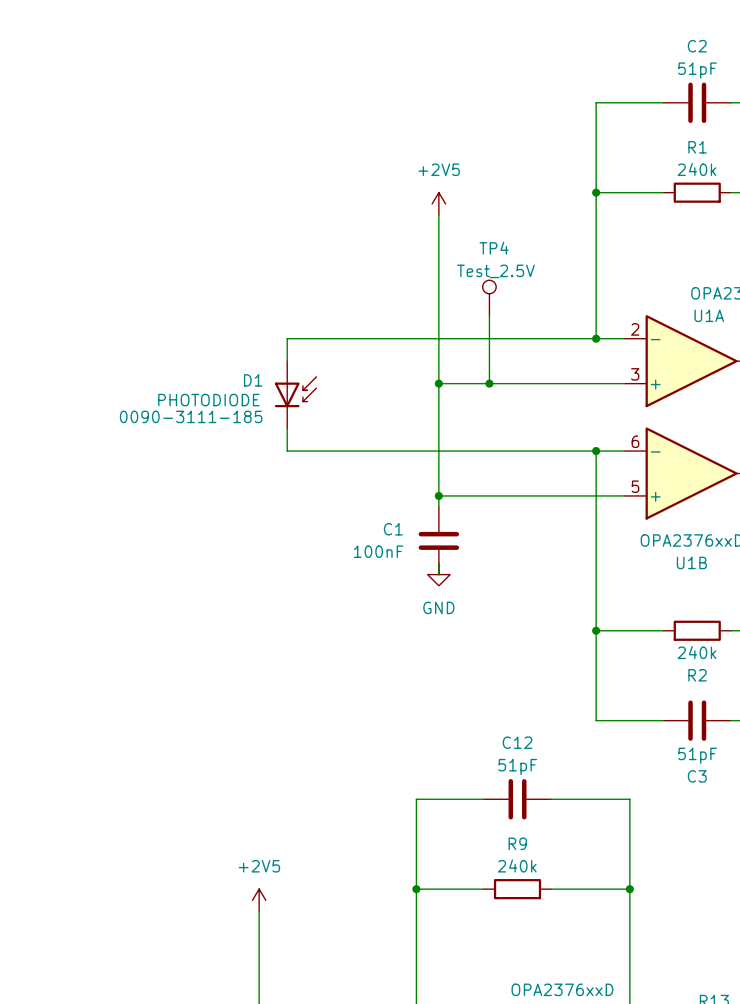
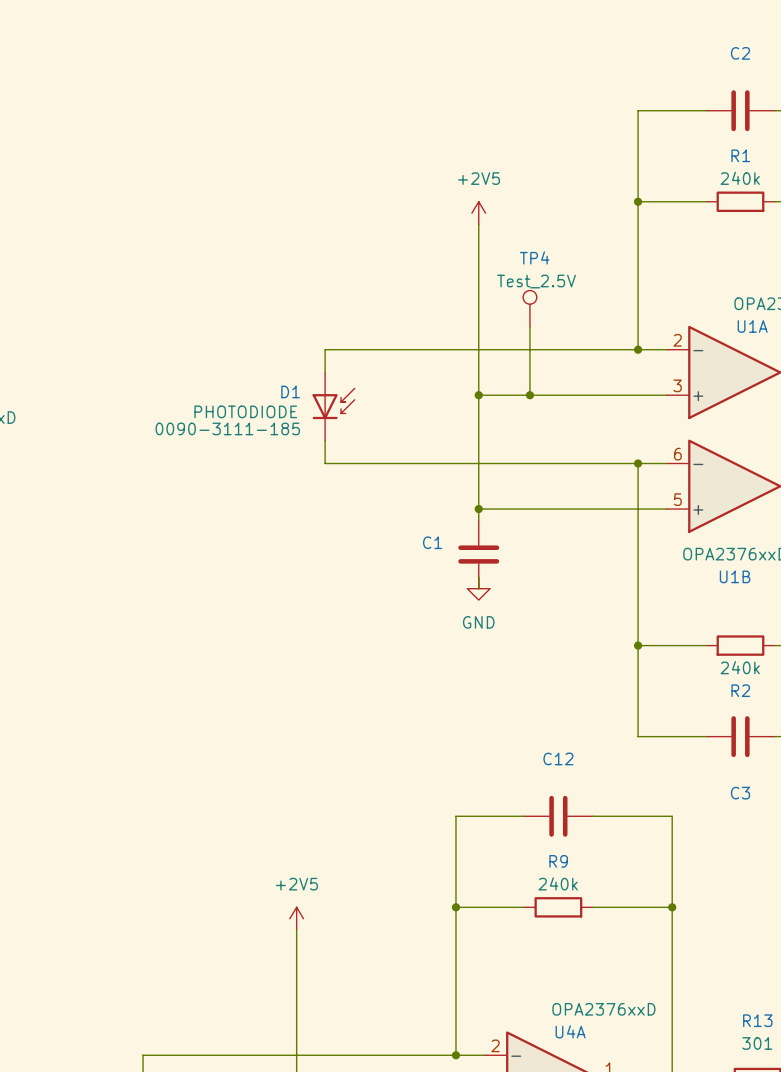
C2 value: 51pF (697, 70) -> none
C1 value: 100nF (378, 551) -> none
C3 value: 51pF (697, 755) -> none
C12 value: 51pF (517, 767) -> none

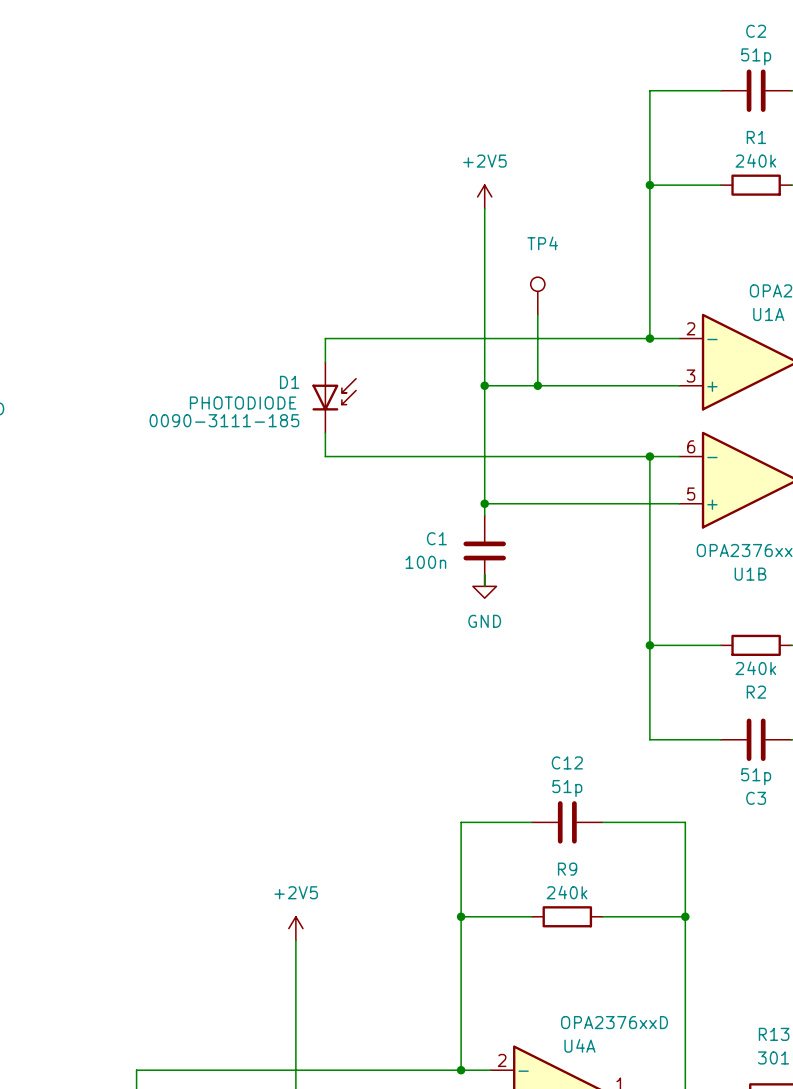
C2 value: none -> 51p (756, 56)
TP4 value: Test_2.5V (536, 281) -> none
C1 value: none -> 100n (425, 562)
C3 value: none -> 51p (756, 776)
C12 value: none -> 51p (567, 788)

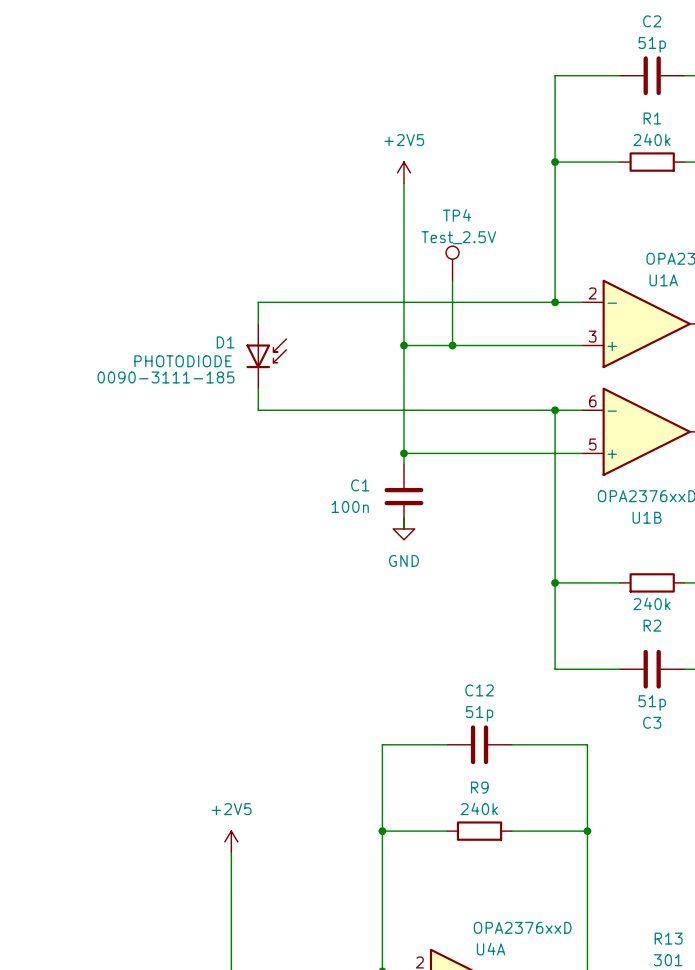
TP4 value: none -> Test_2.5V (458, 237)

